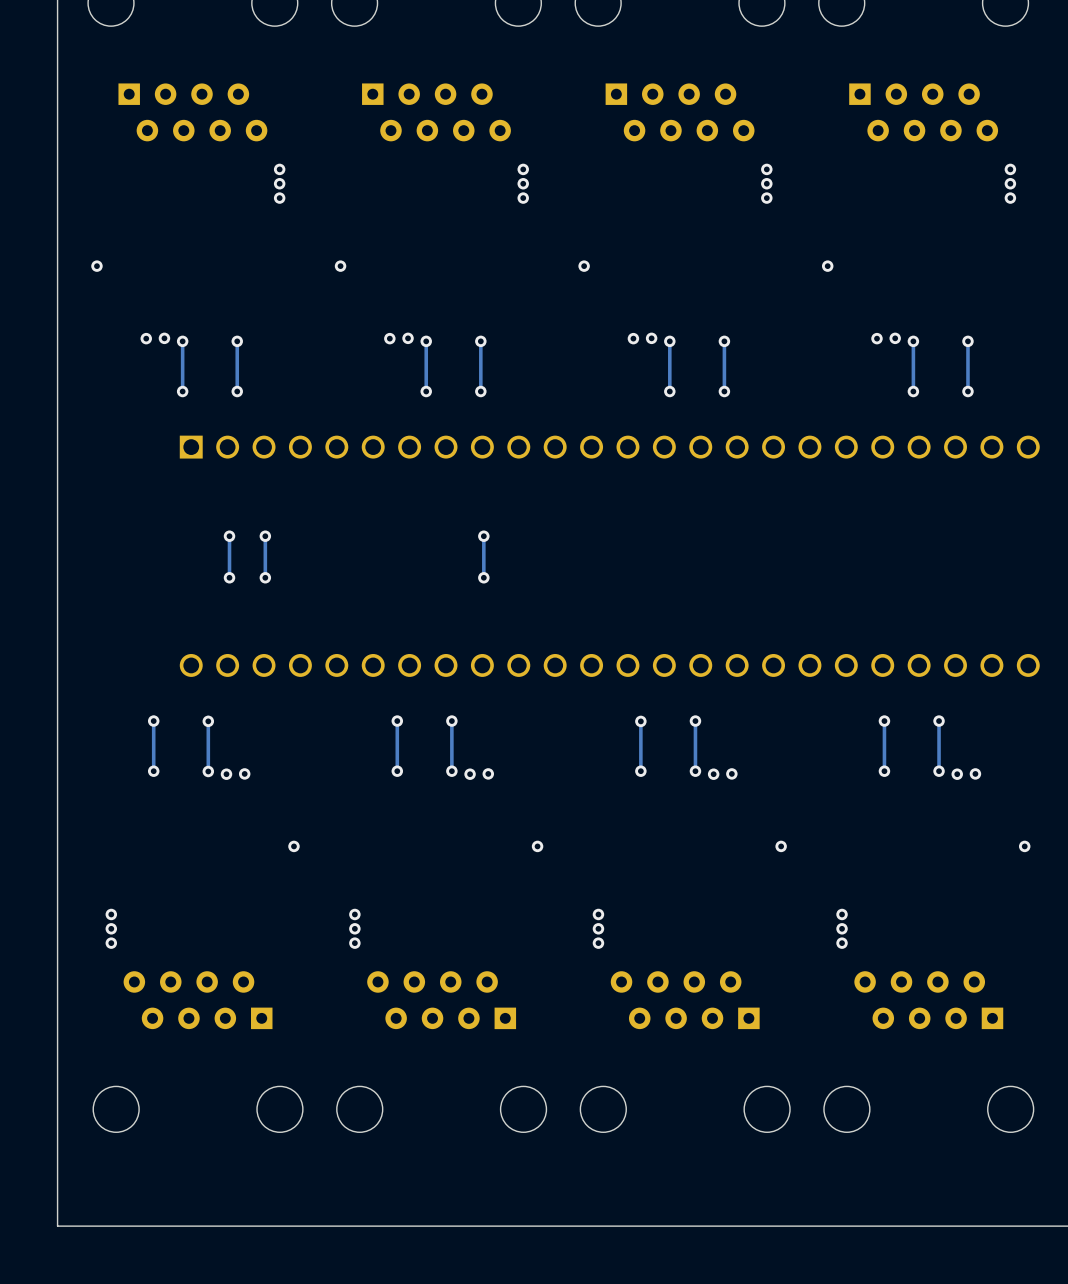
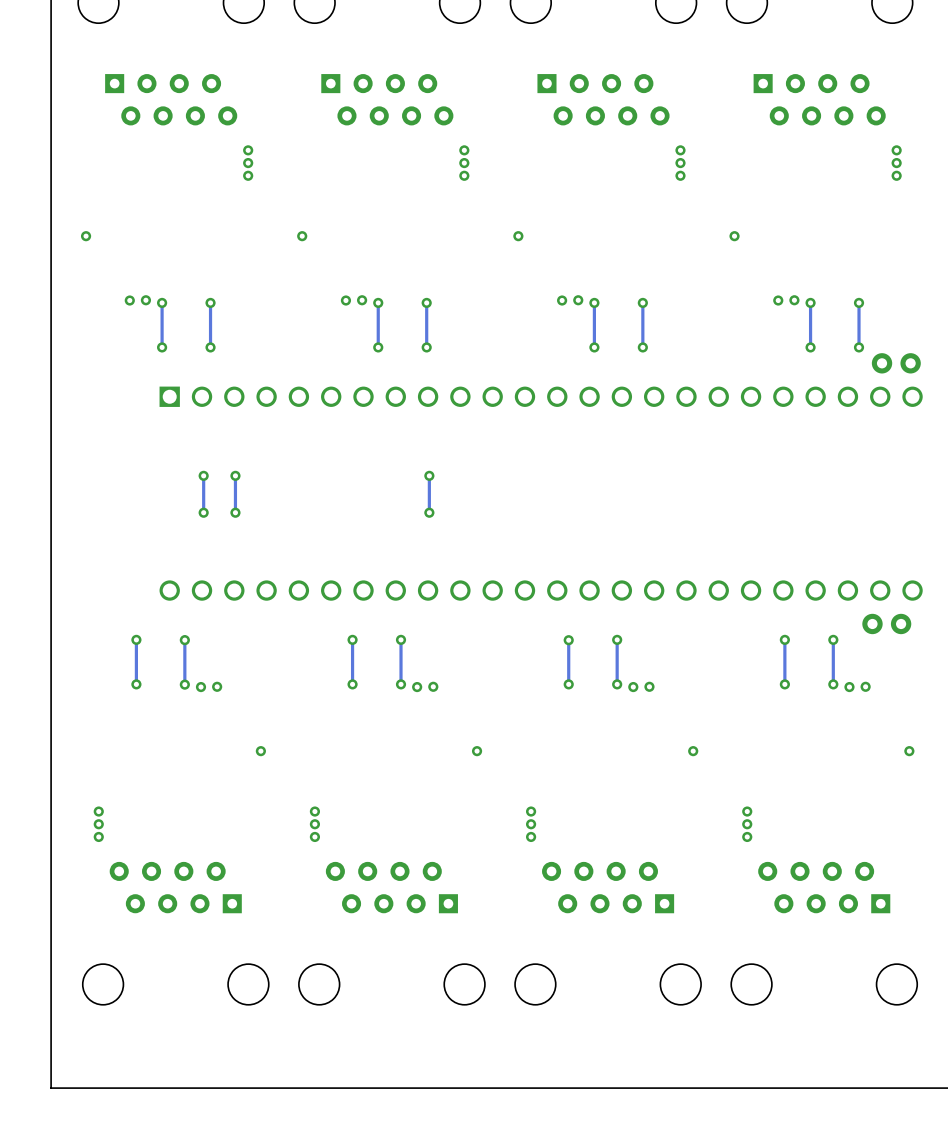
via: none -> (882, 363)
via: none -> (910, 363)
via: none -> (872, 623)
via: none -> (901, 623)

